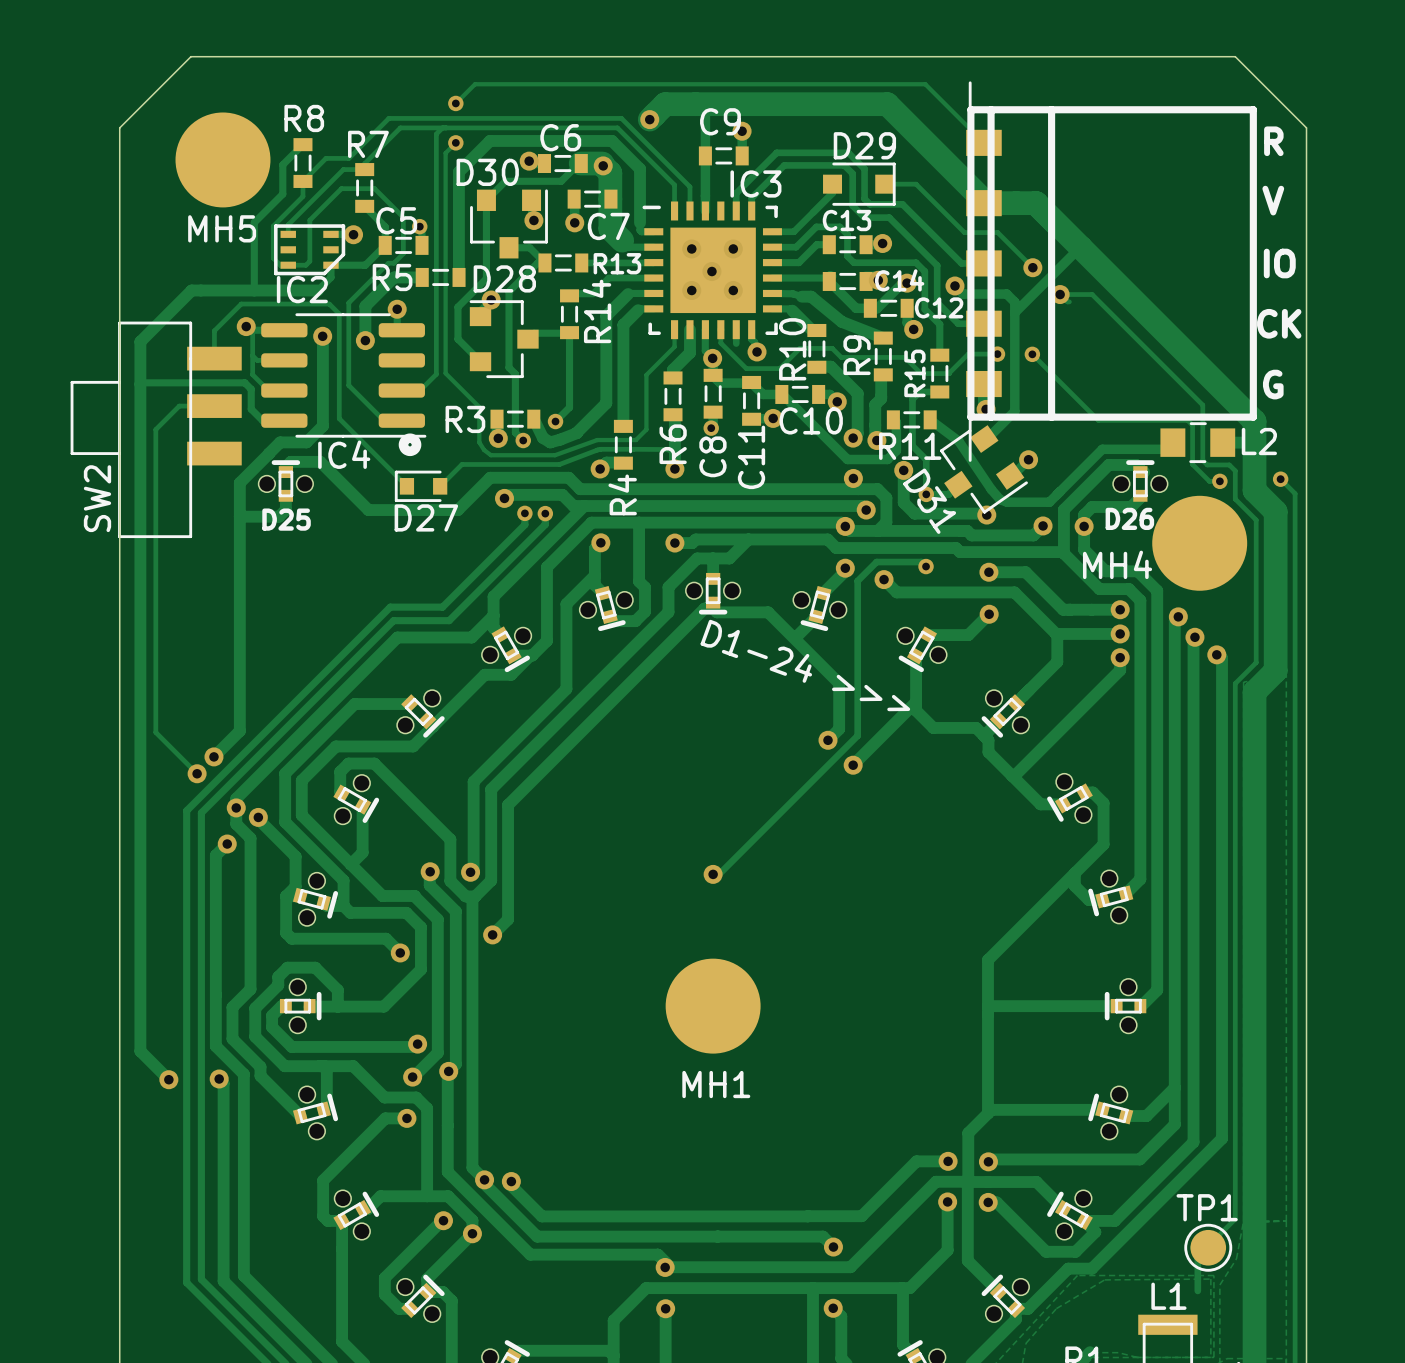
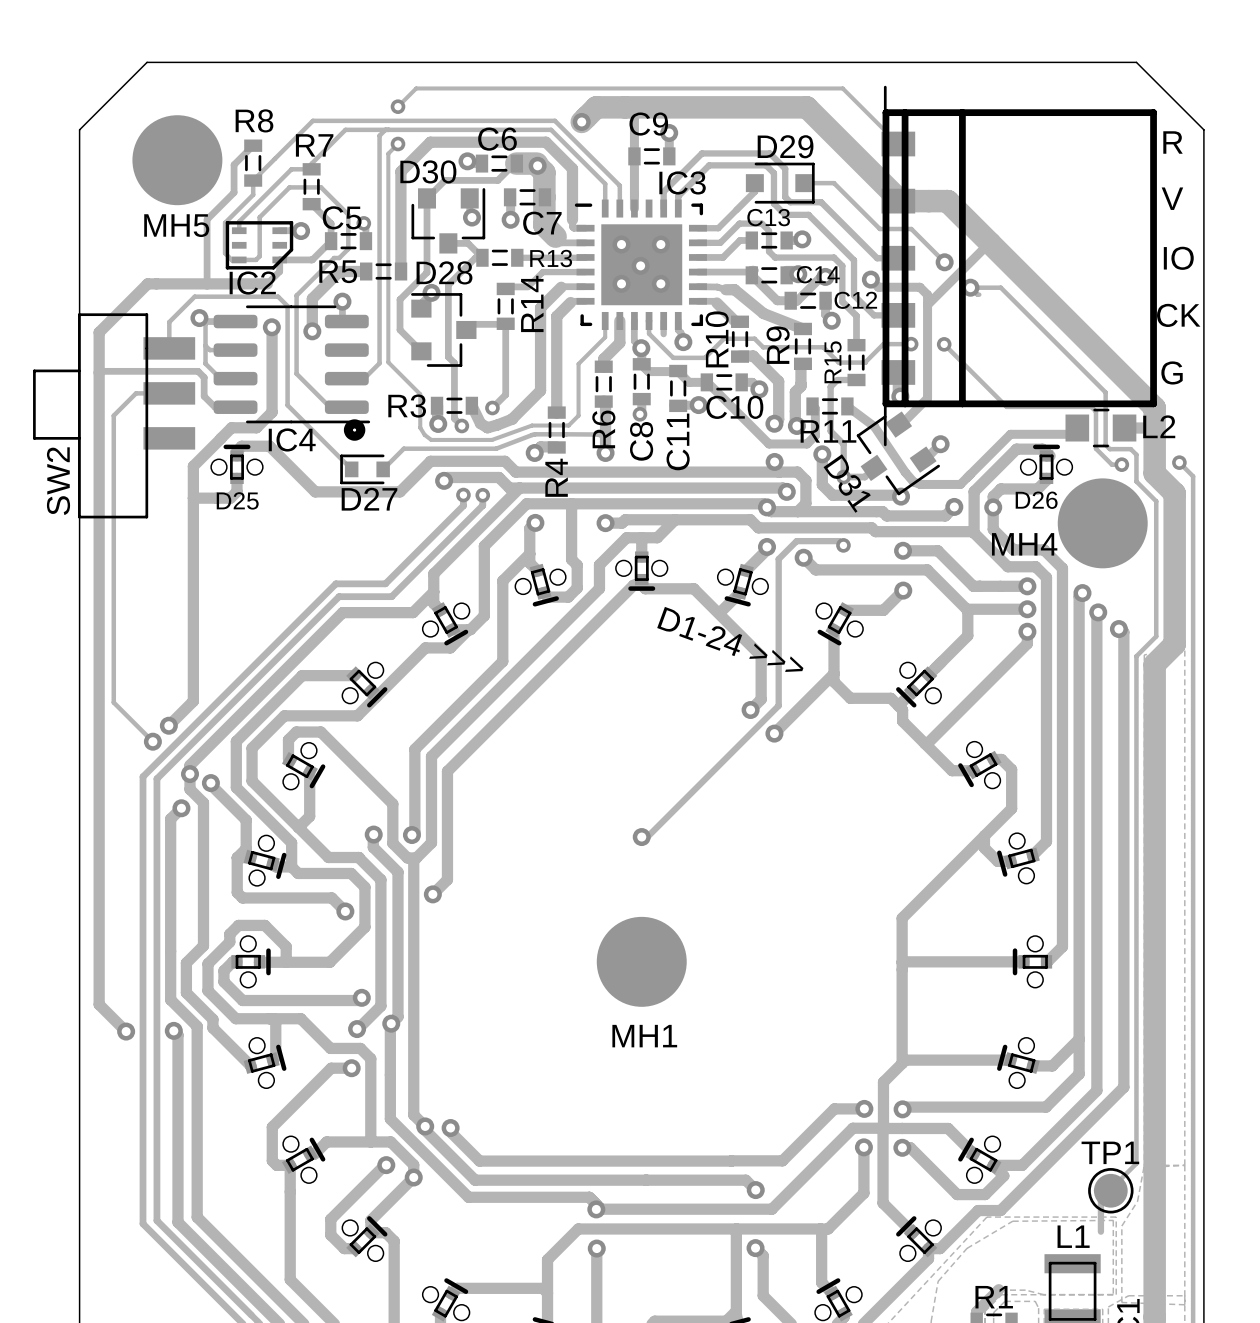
track: (388, 118) (348, 158) (326, 158) -> (334, 120) (312, 120) (275, 158)

